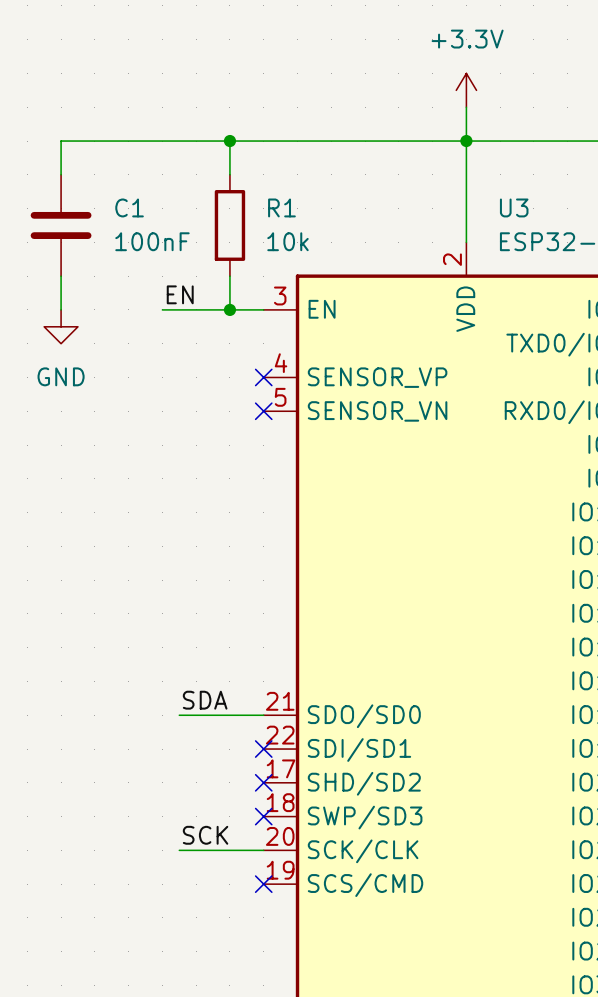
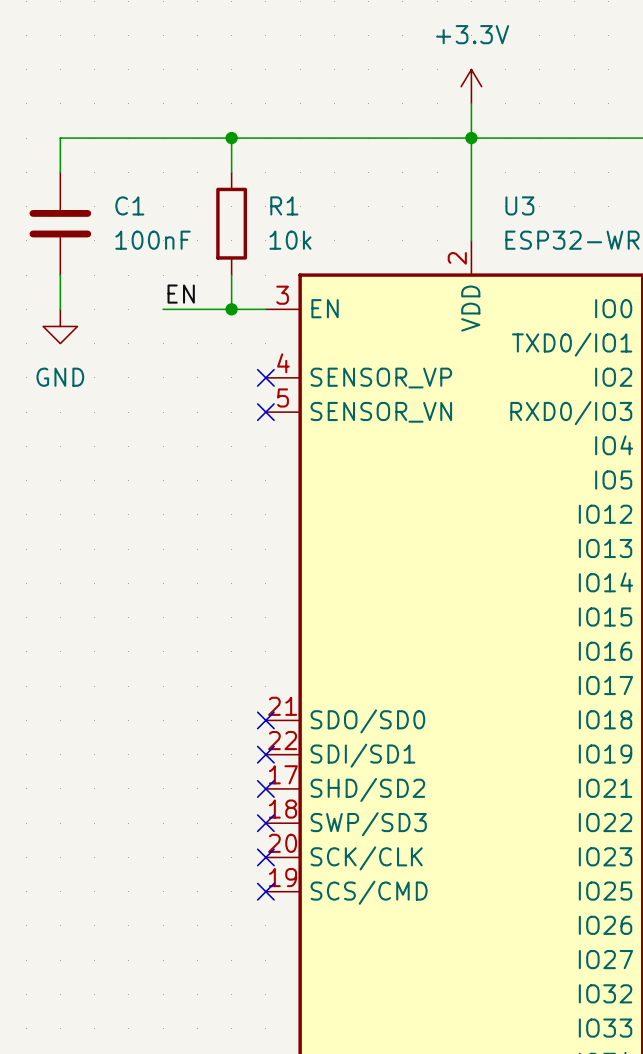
label: SDA (205, 700) -> none
wire: (179, 715) (263, 715) -> none
no-connect mark: none -> (265, 720)
label: SCK (205, 835) -> none
wire: (179, 850) (263, 850) -> none
no-connect mark: none -> (265, 857)

